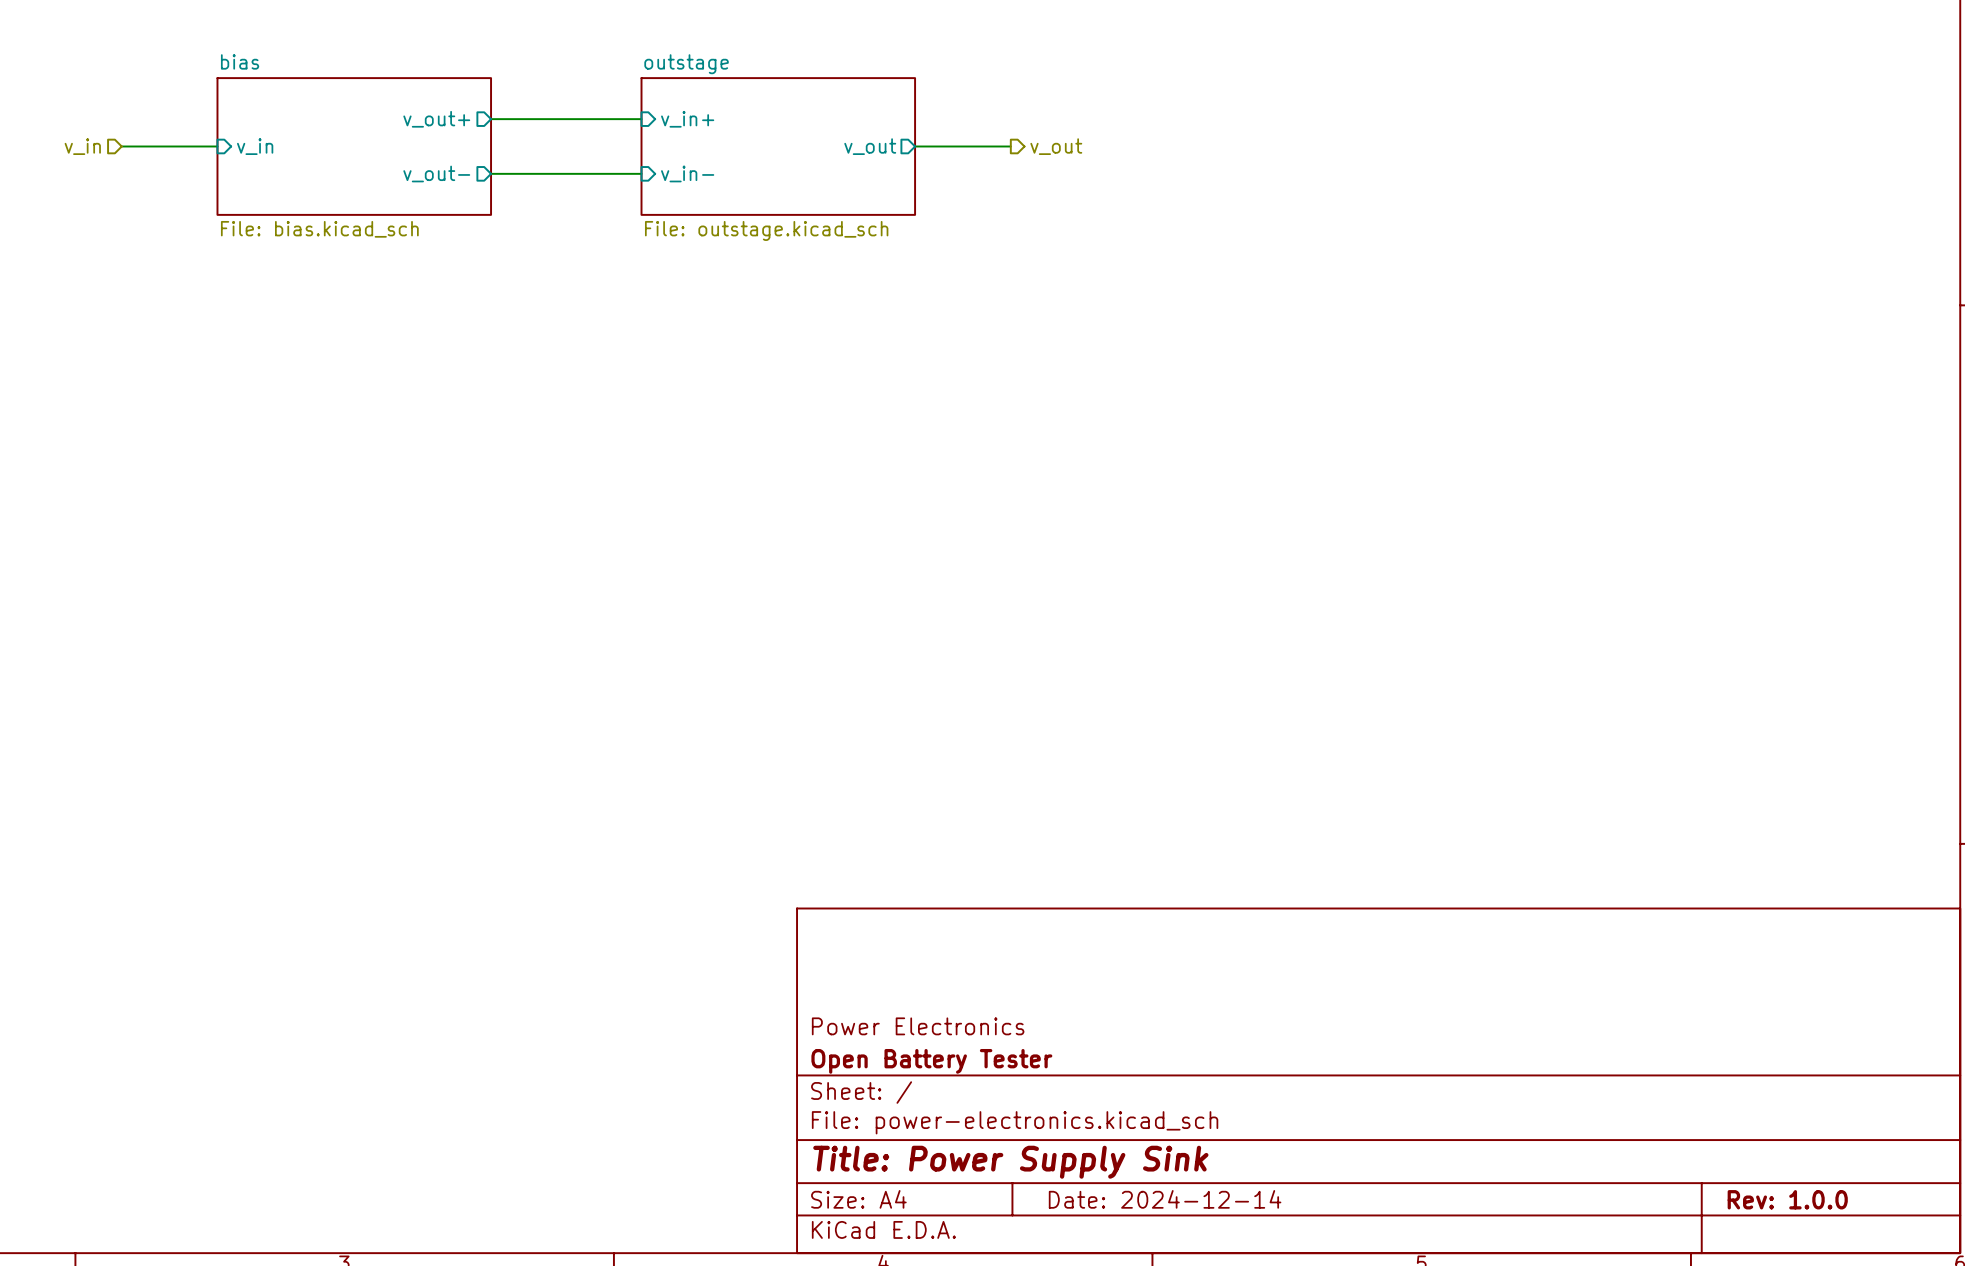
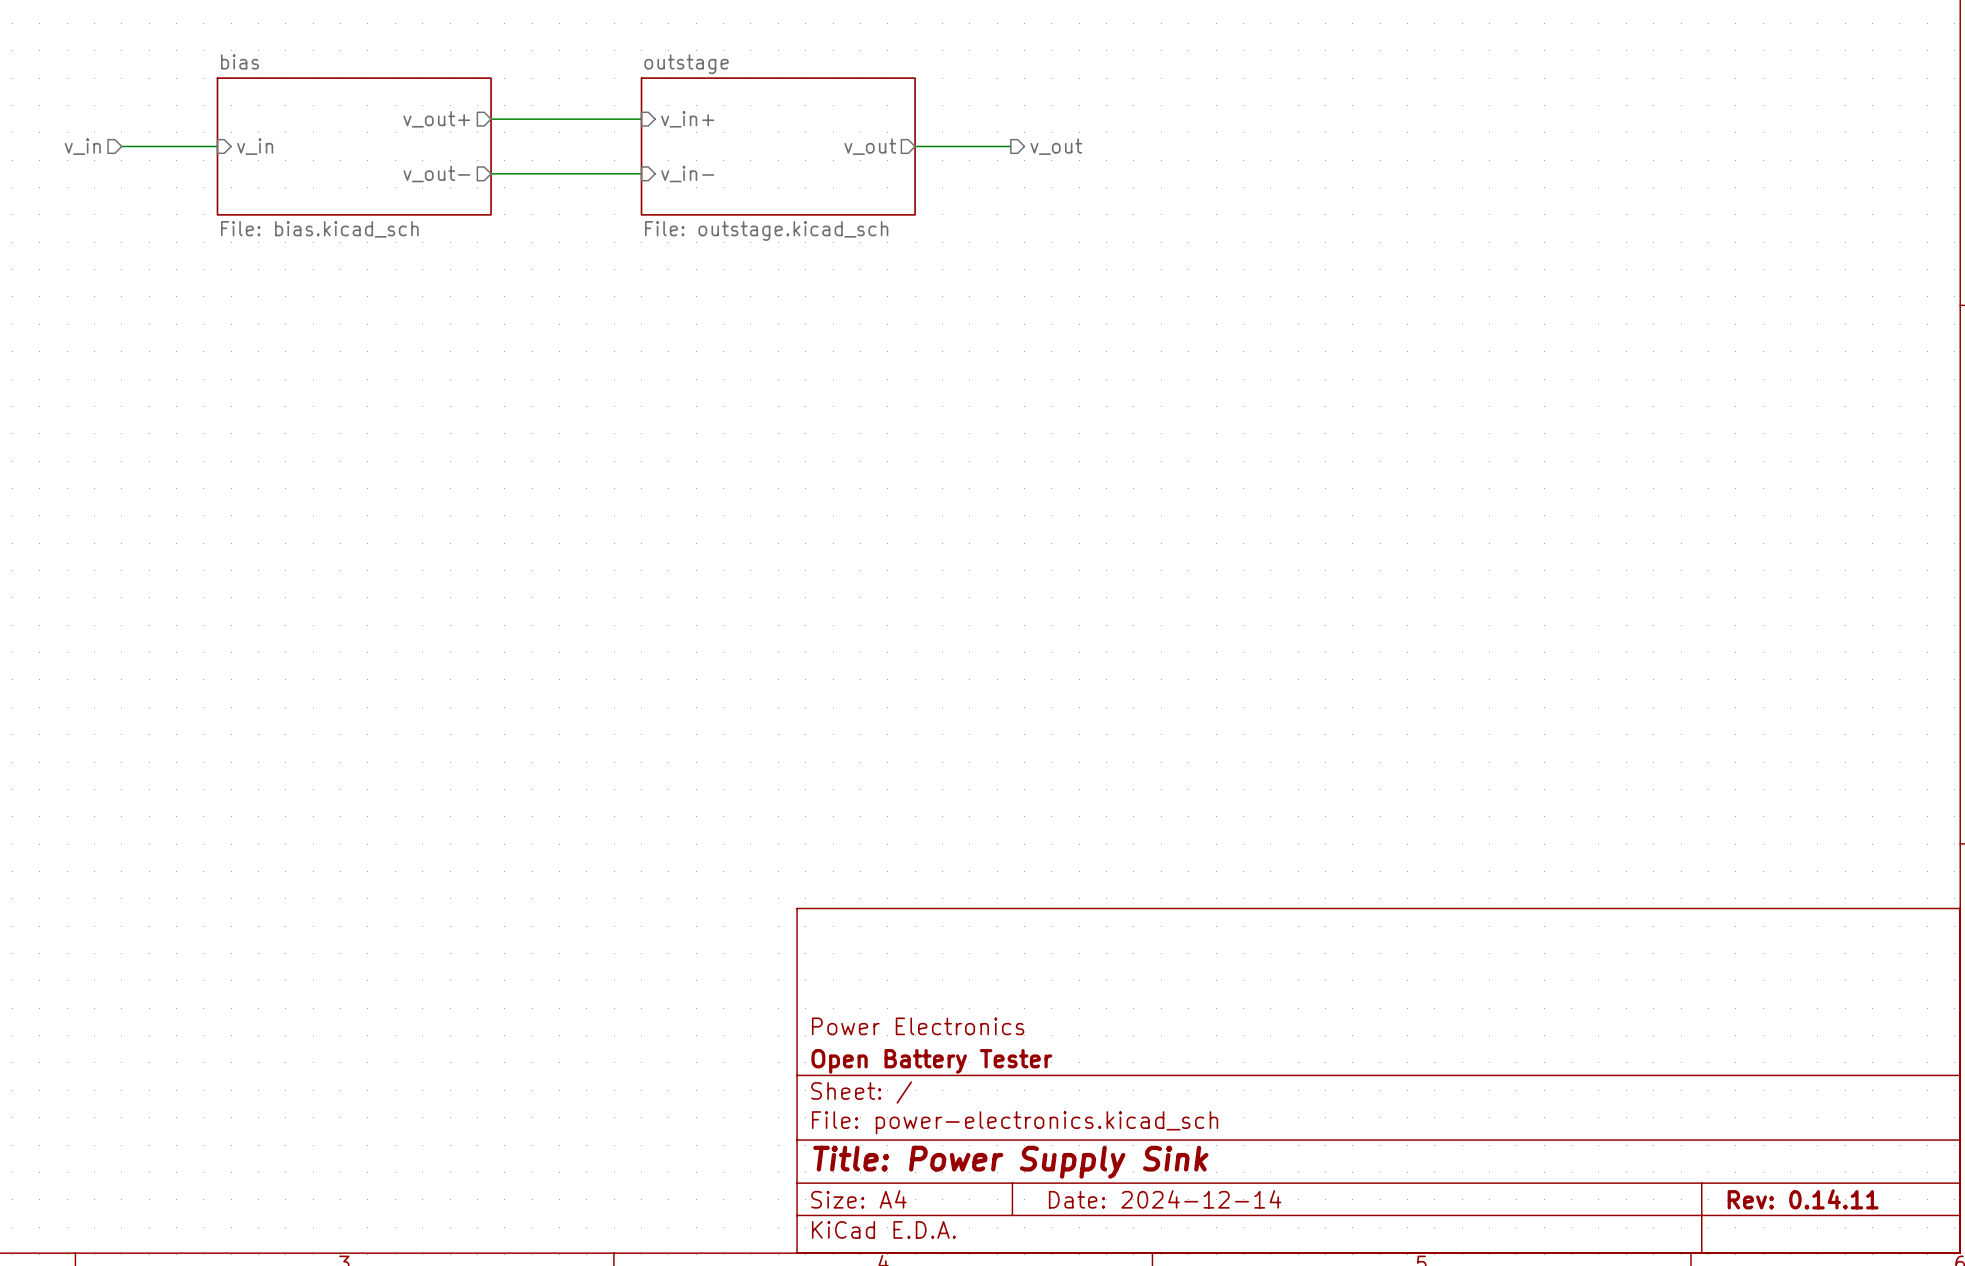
title block: Rev: 1.0.0 (1787, 1199) -> Rev: 0.14.11 (1803, 1199)

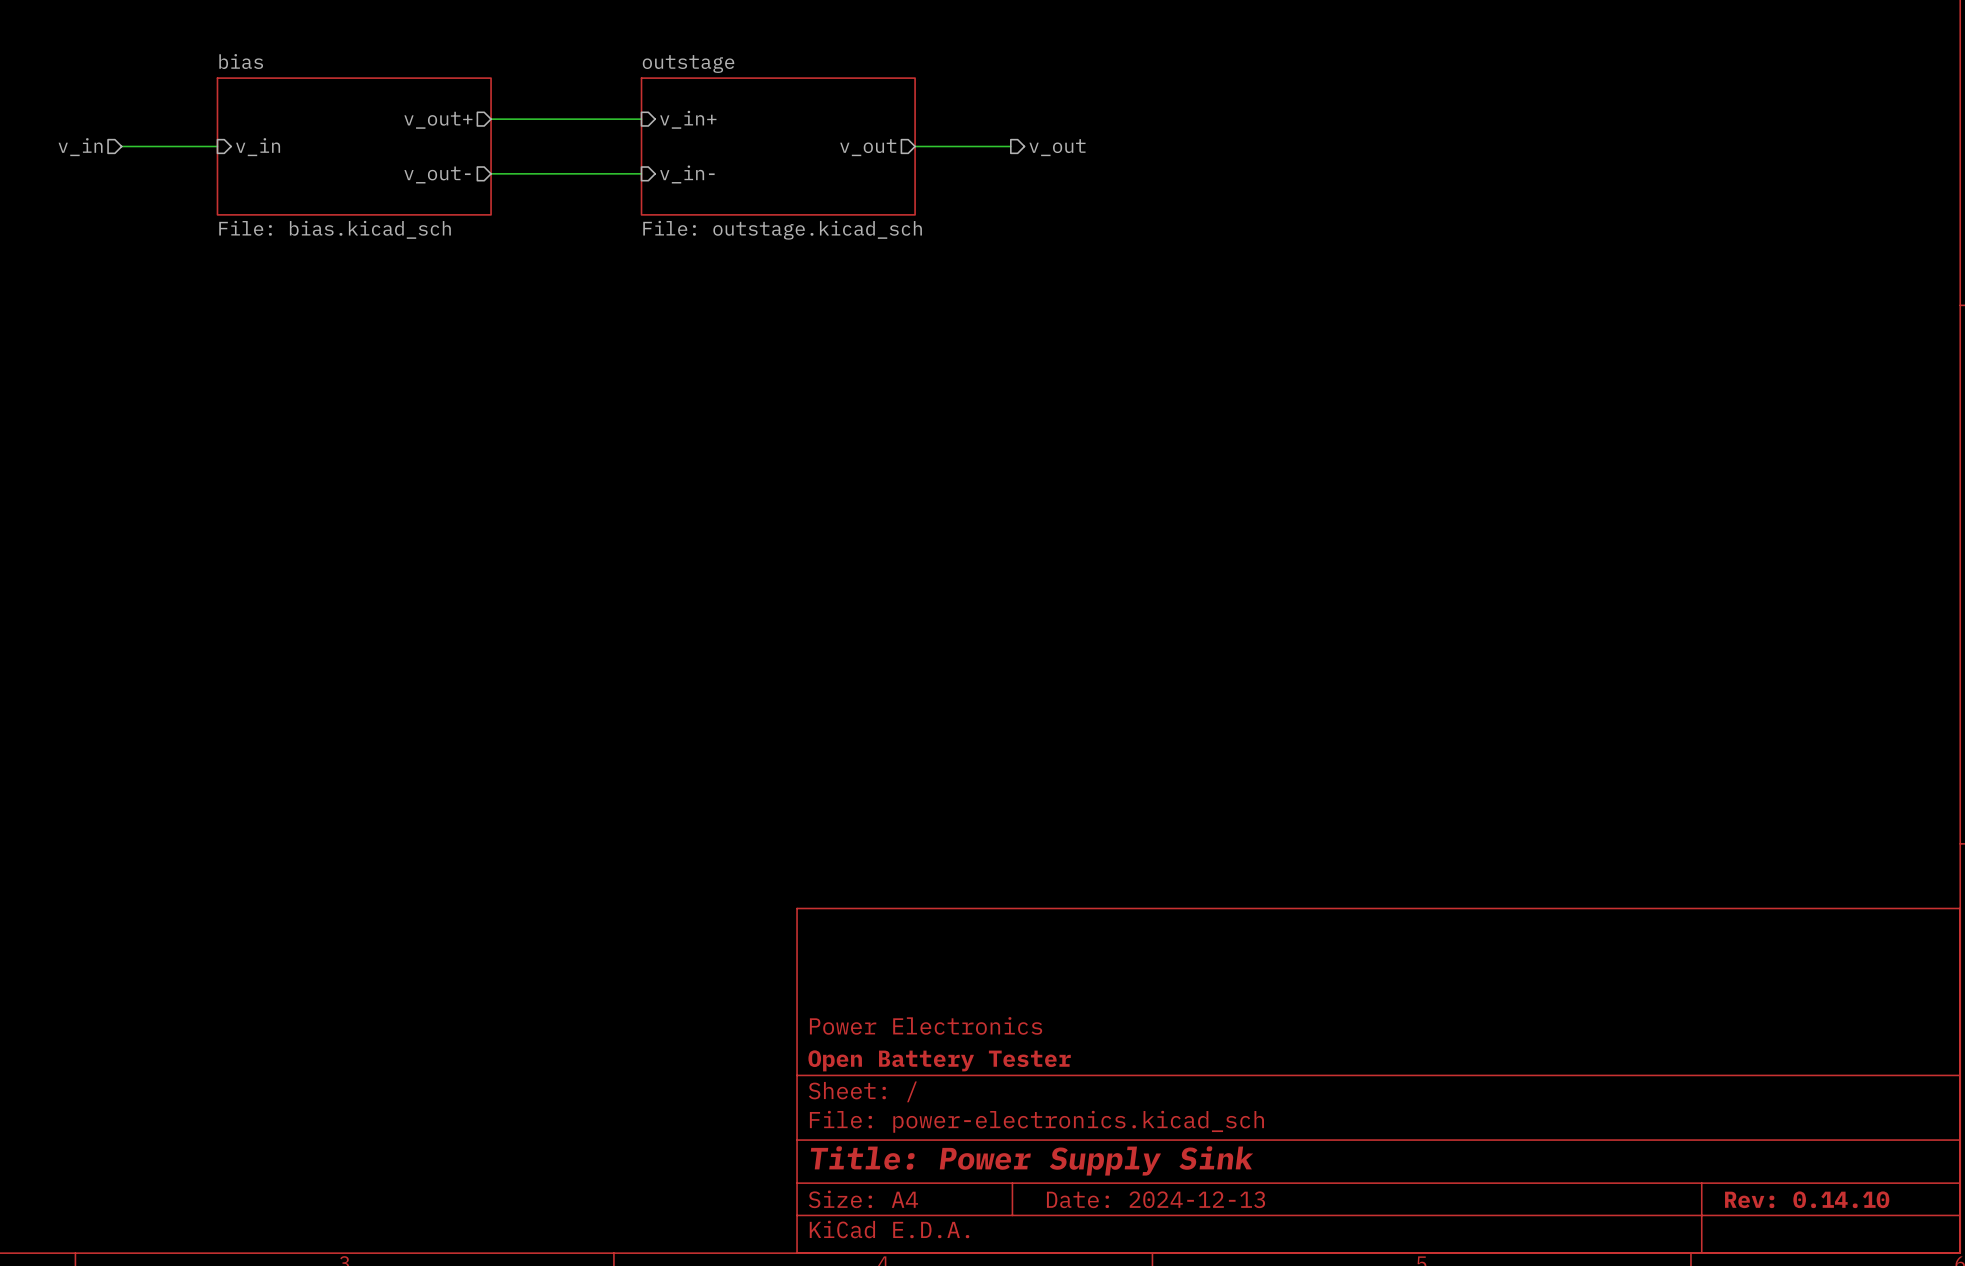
title block: Date: 2024-12-14 (1165, 1199) -> Date: 2024-12-13 (1156, 1199)
title block: Rev: 0.14.11 (1803, 1199) -> Rev: 0.14.10 (1807, 1199)

